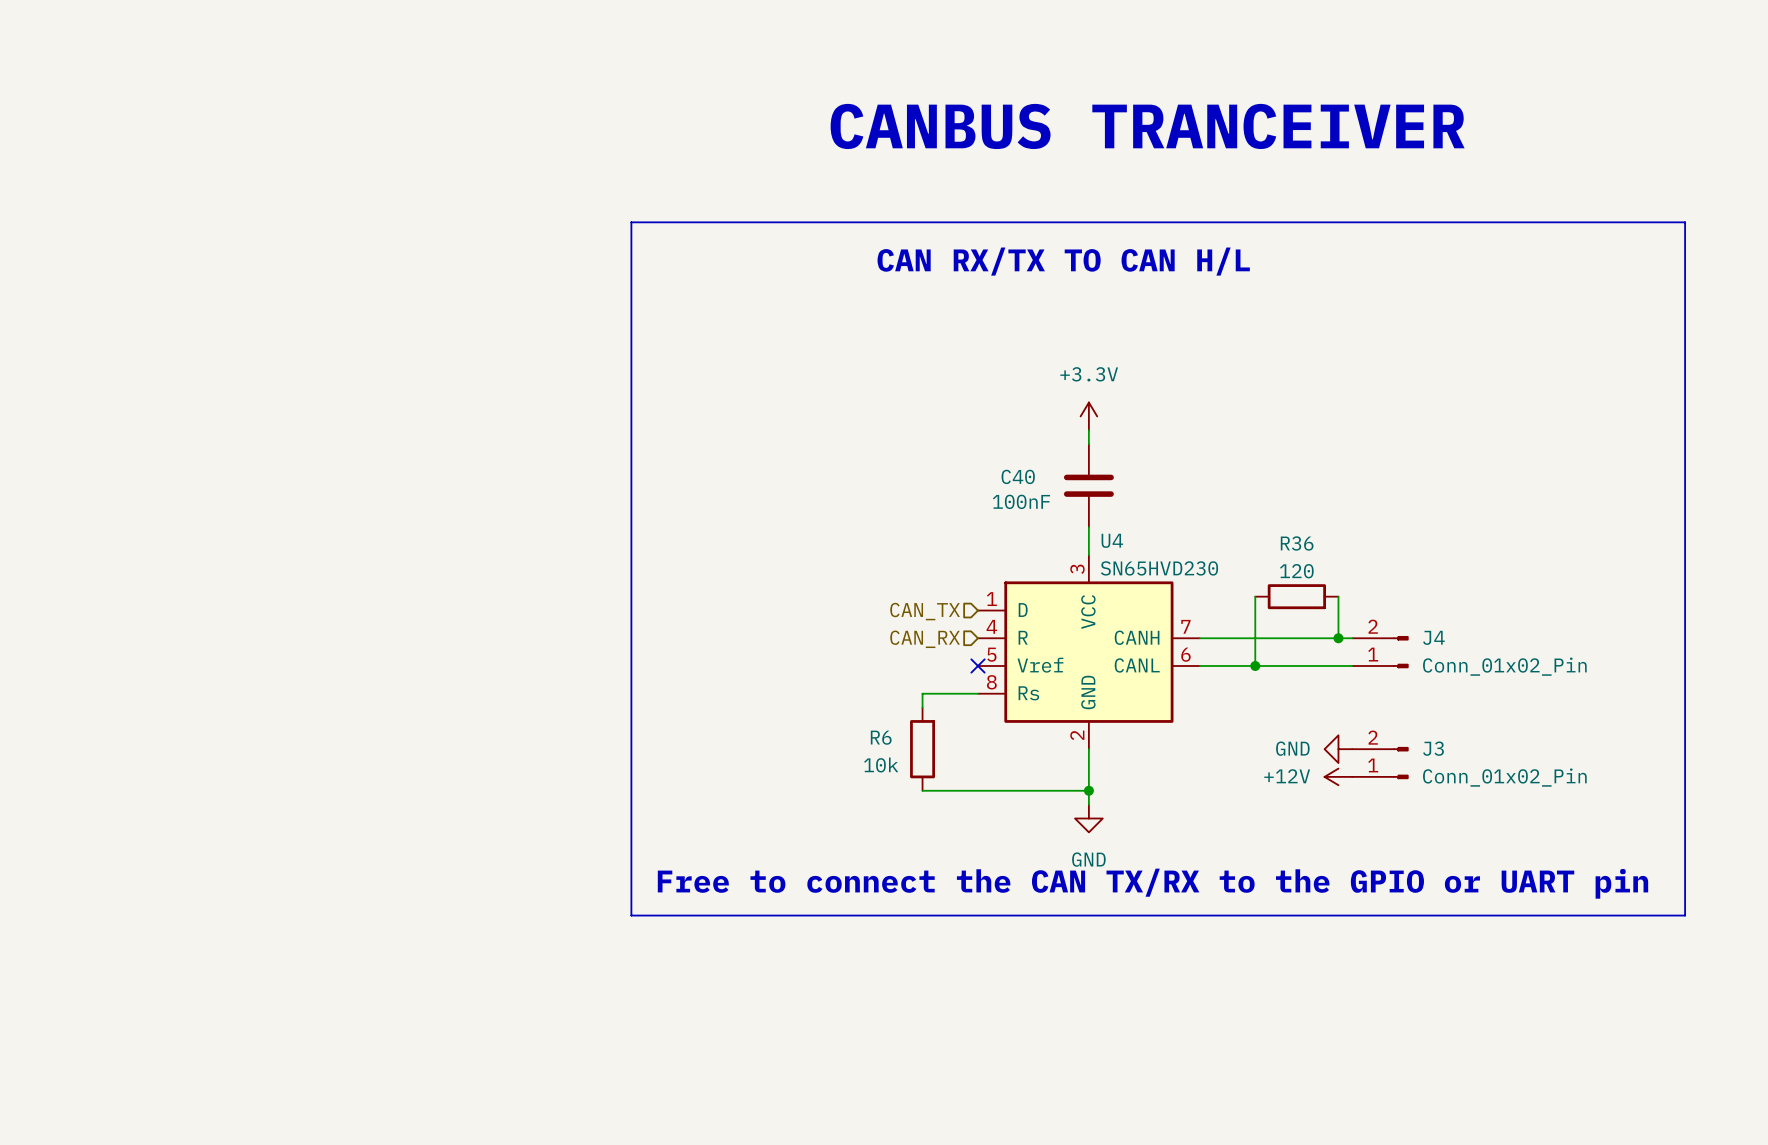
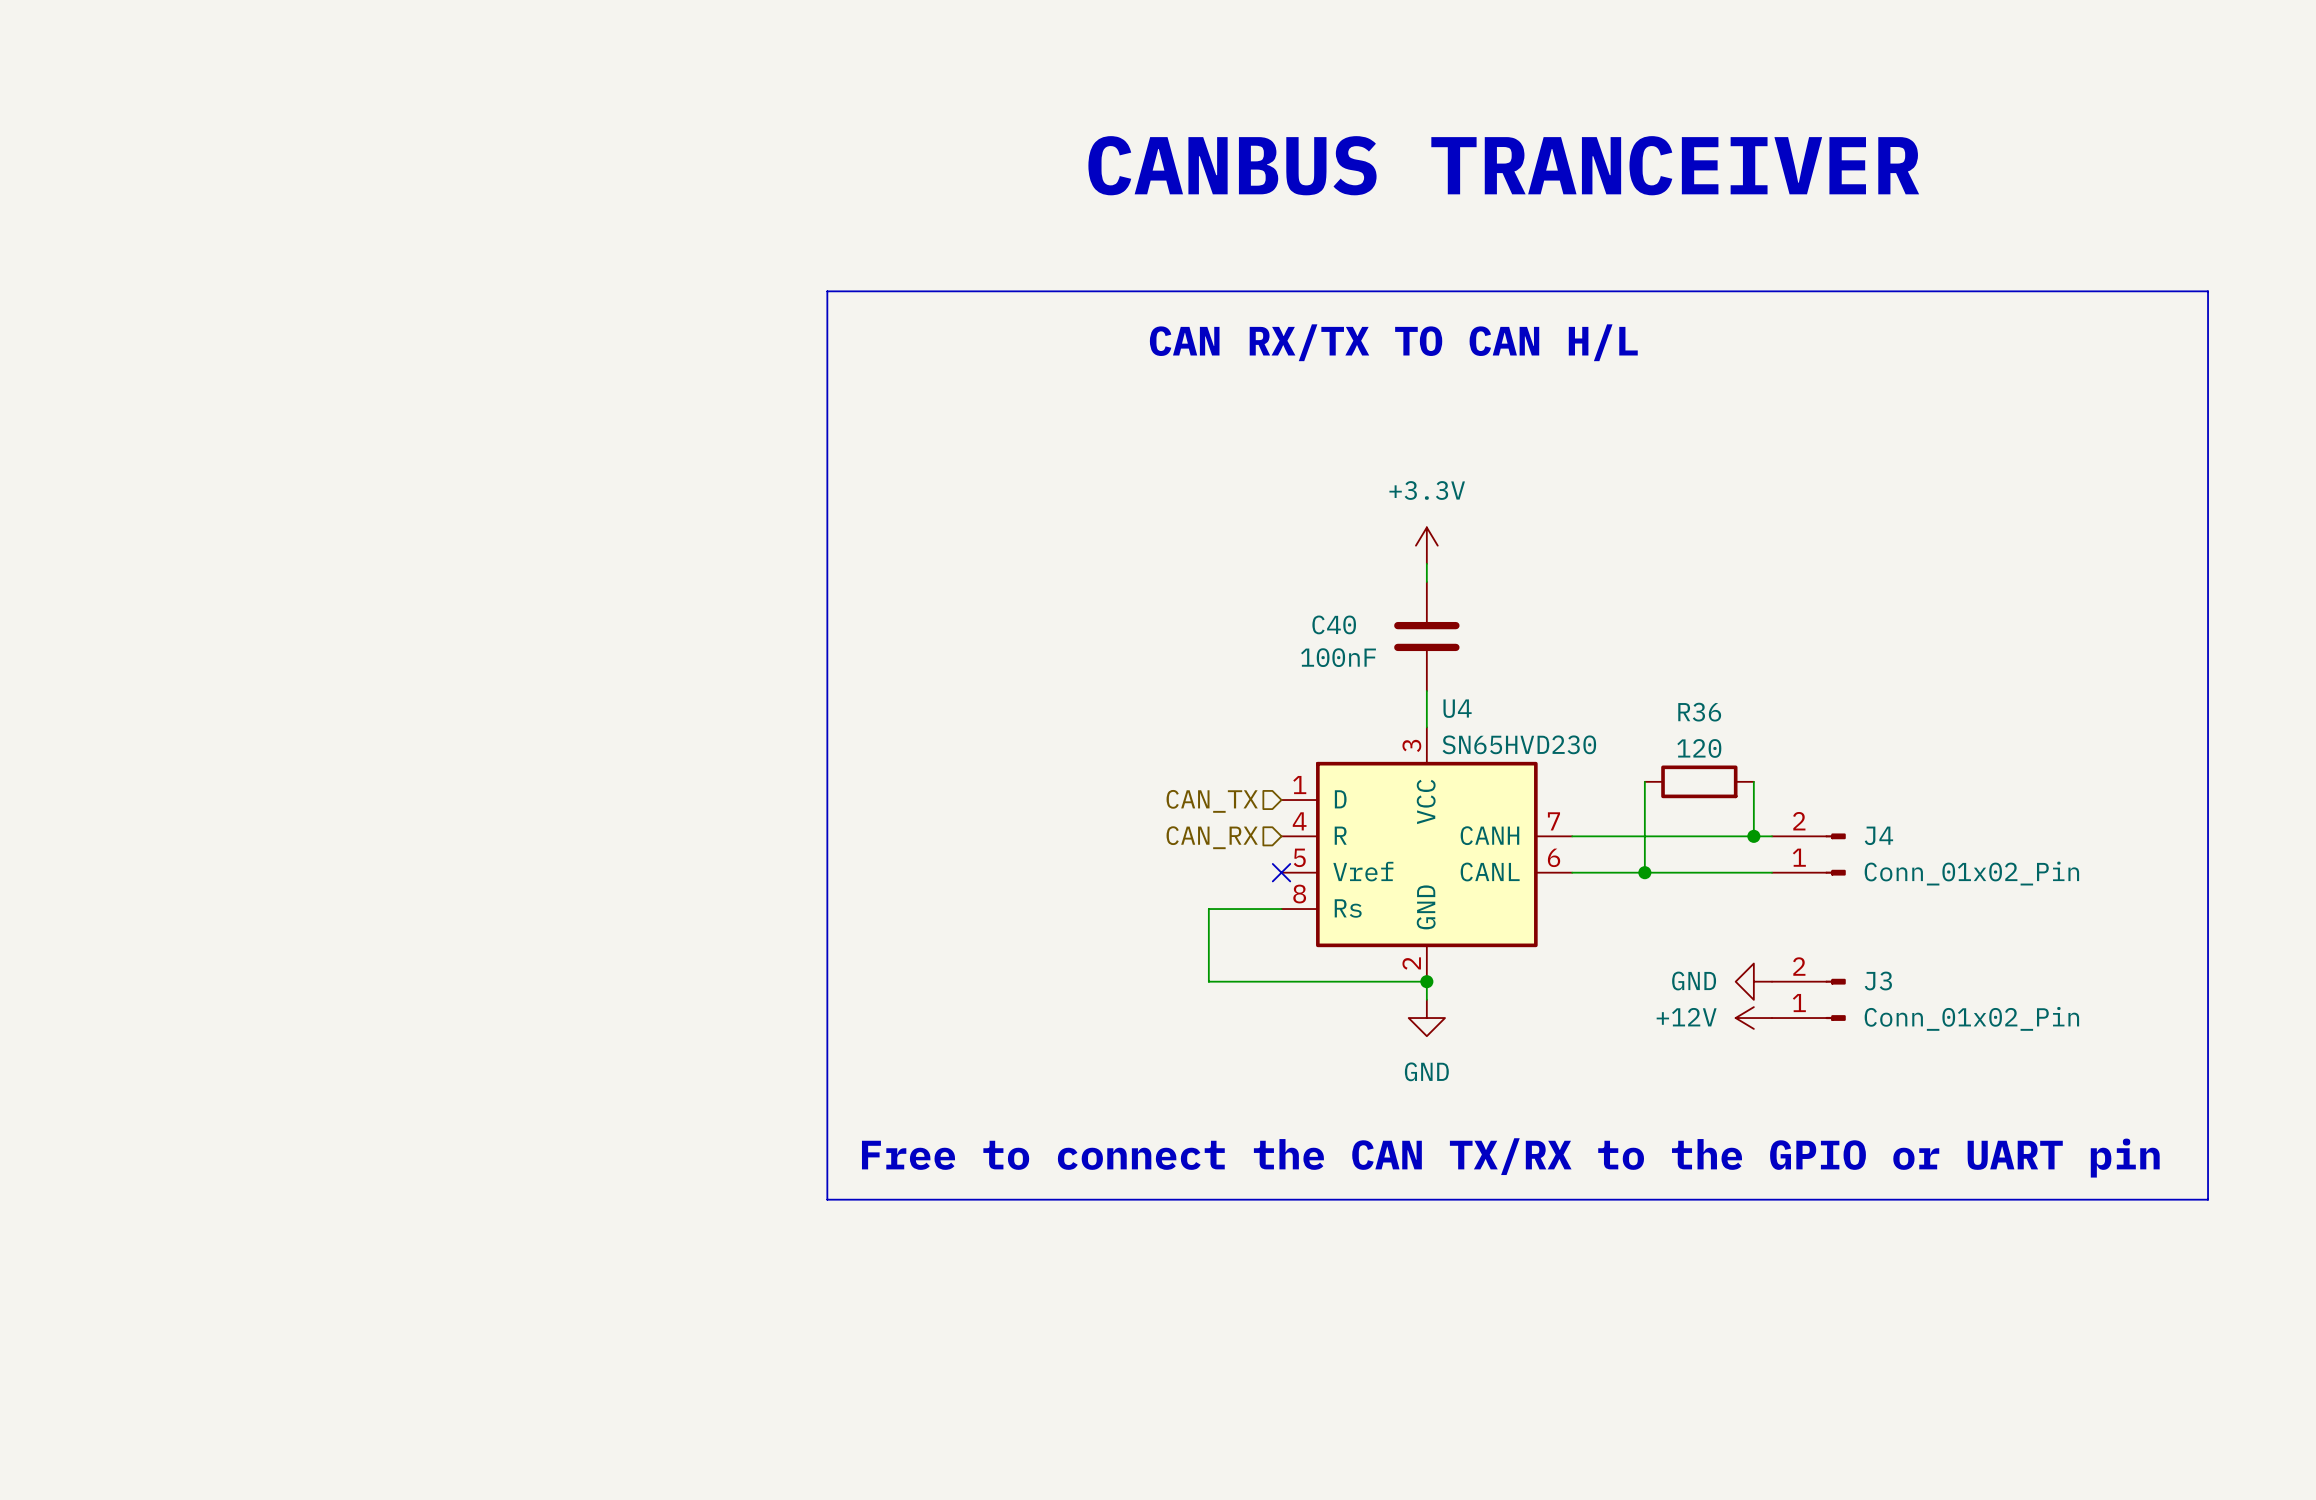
wire: none -> (1208, 927) (1208, 981) (1426, 981)
R6: 10k (922, 749) -> none
wire: (1088, 763) (1088, 804) -> none
wire: (922, 790) (1088, 790) -> none
junction position: (1088, 790) -> (1426, 981)
power symbol position: GND (1088, 818) -> GND (1426, 1018)

